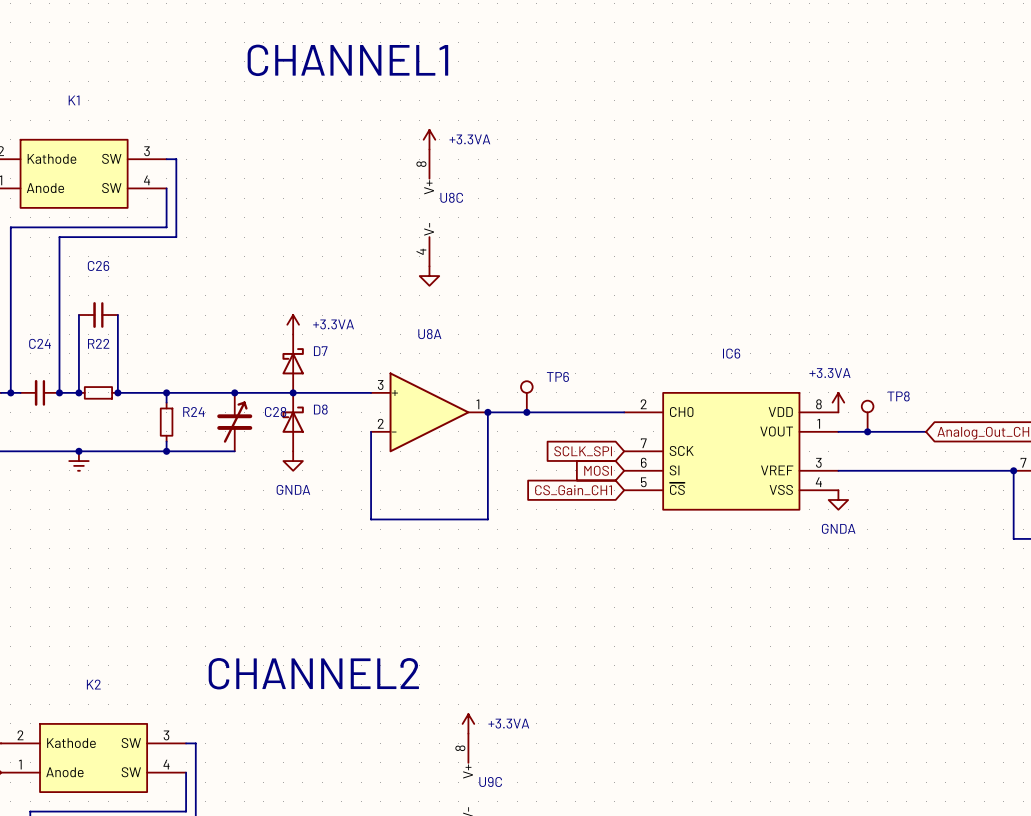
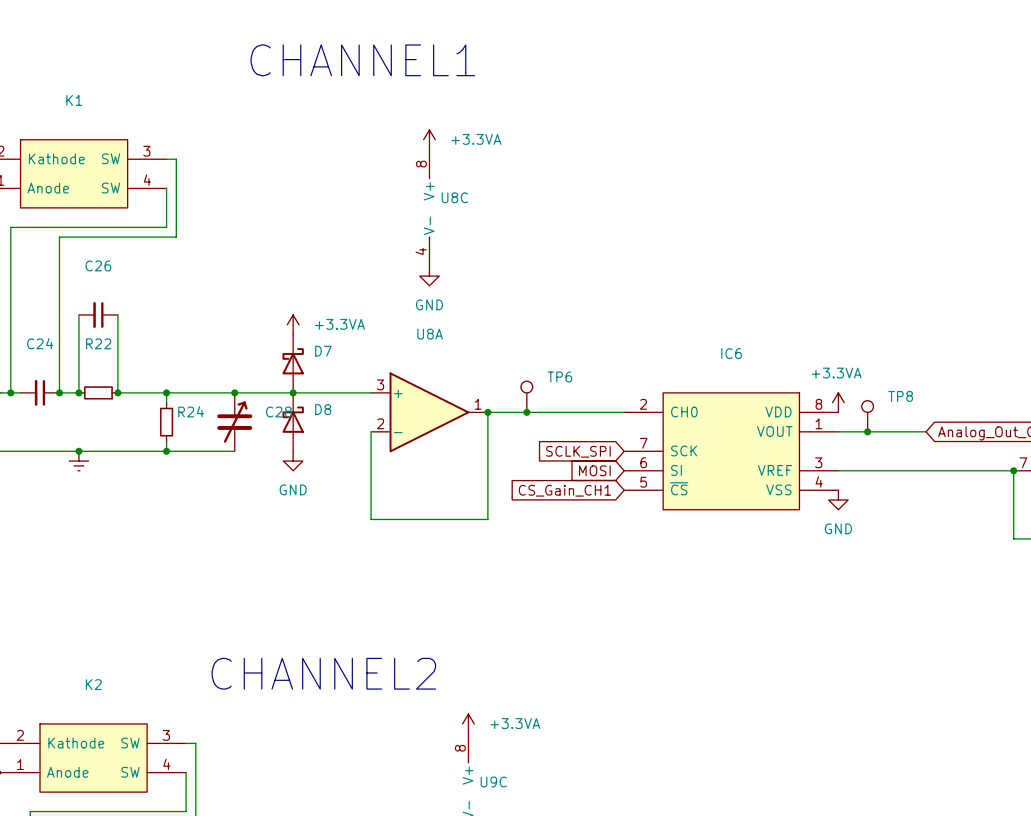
power symbol text: none -> GND (429, 304)
power symbol: GNDA (293, 461) -> GND (293, 461)
power symbol: GNDA (838, 499) -> GND (838, 499)

